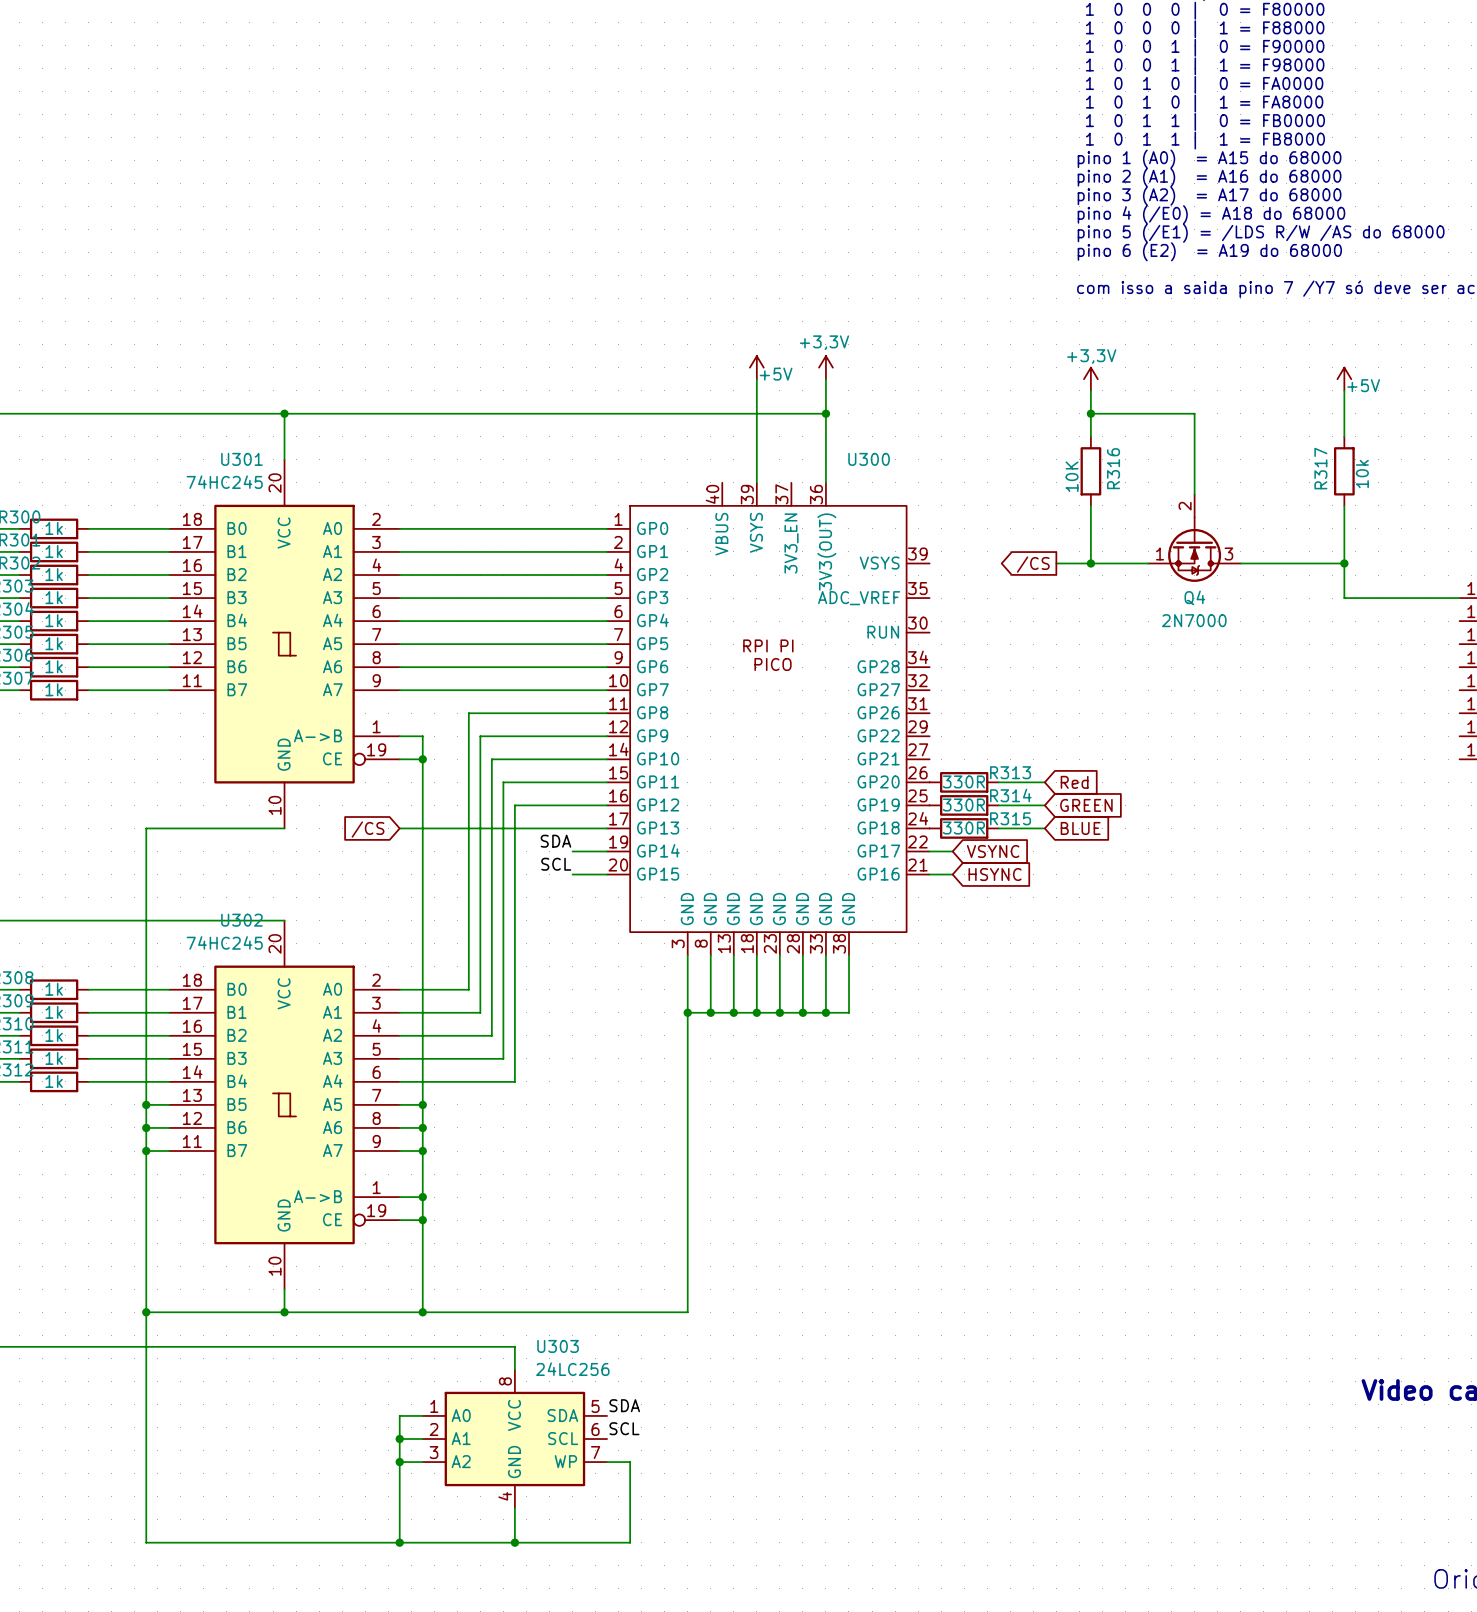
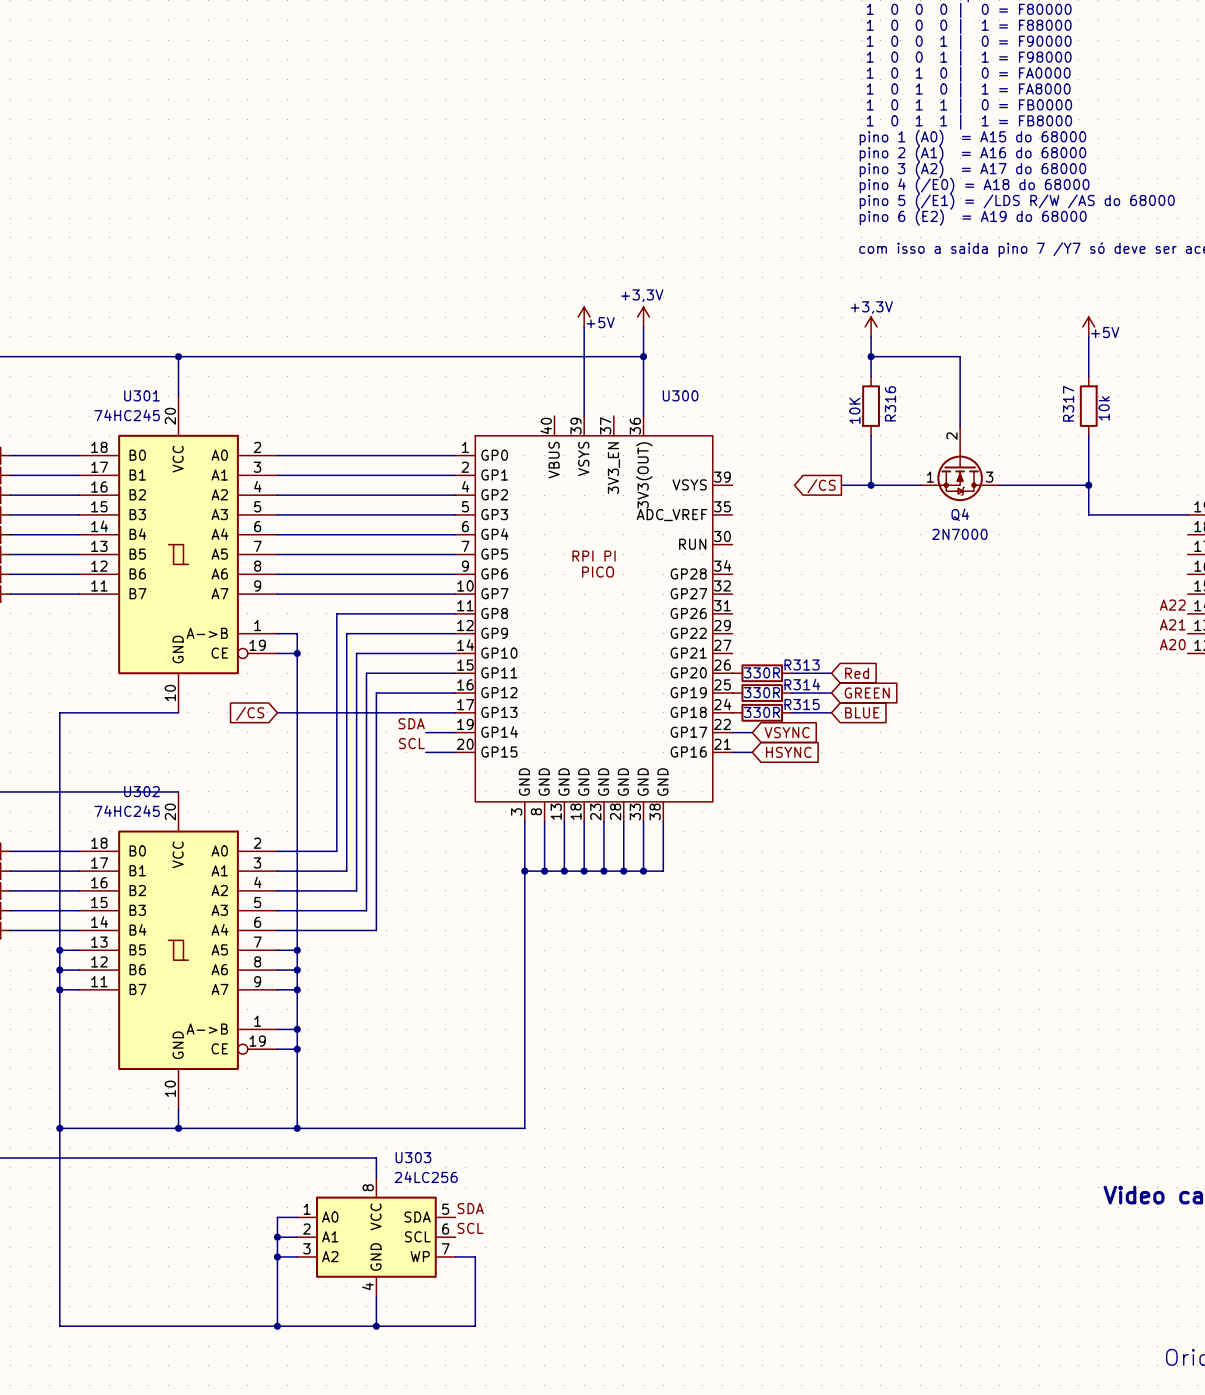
label: none -> A22 (1172, 605)
label: none -> A21 (1172, 624)
label: none -> A20 (1172, 644)

